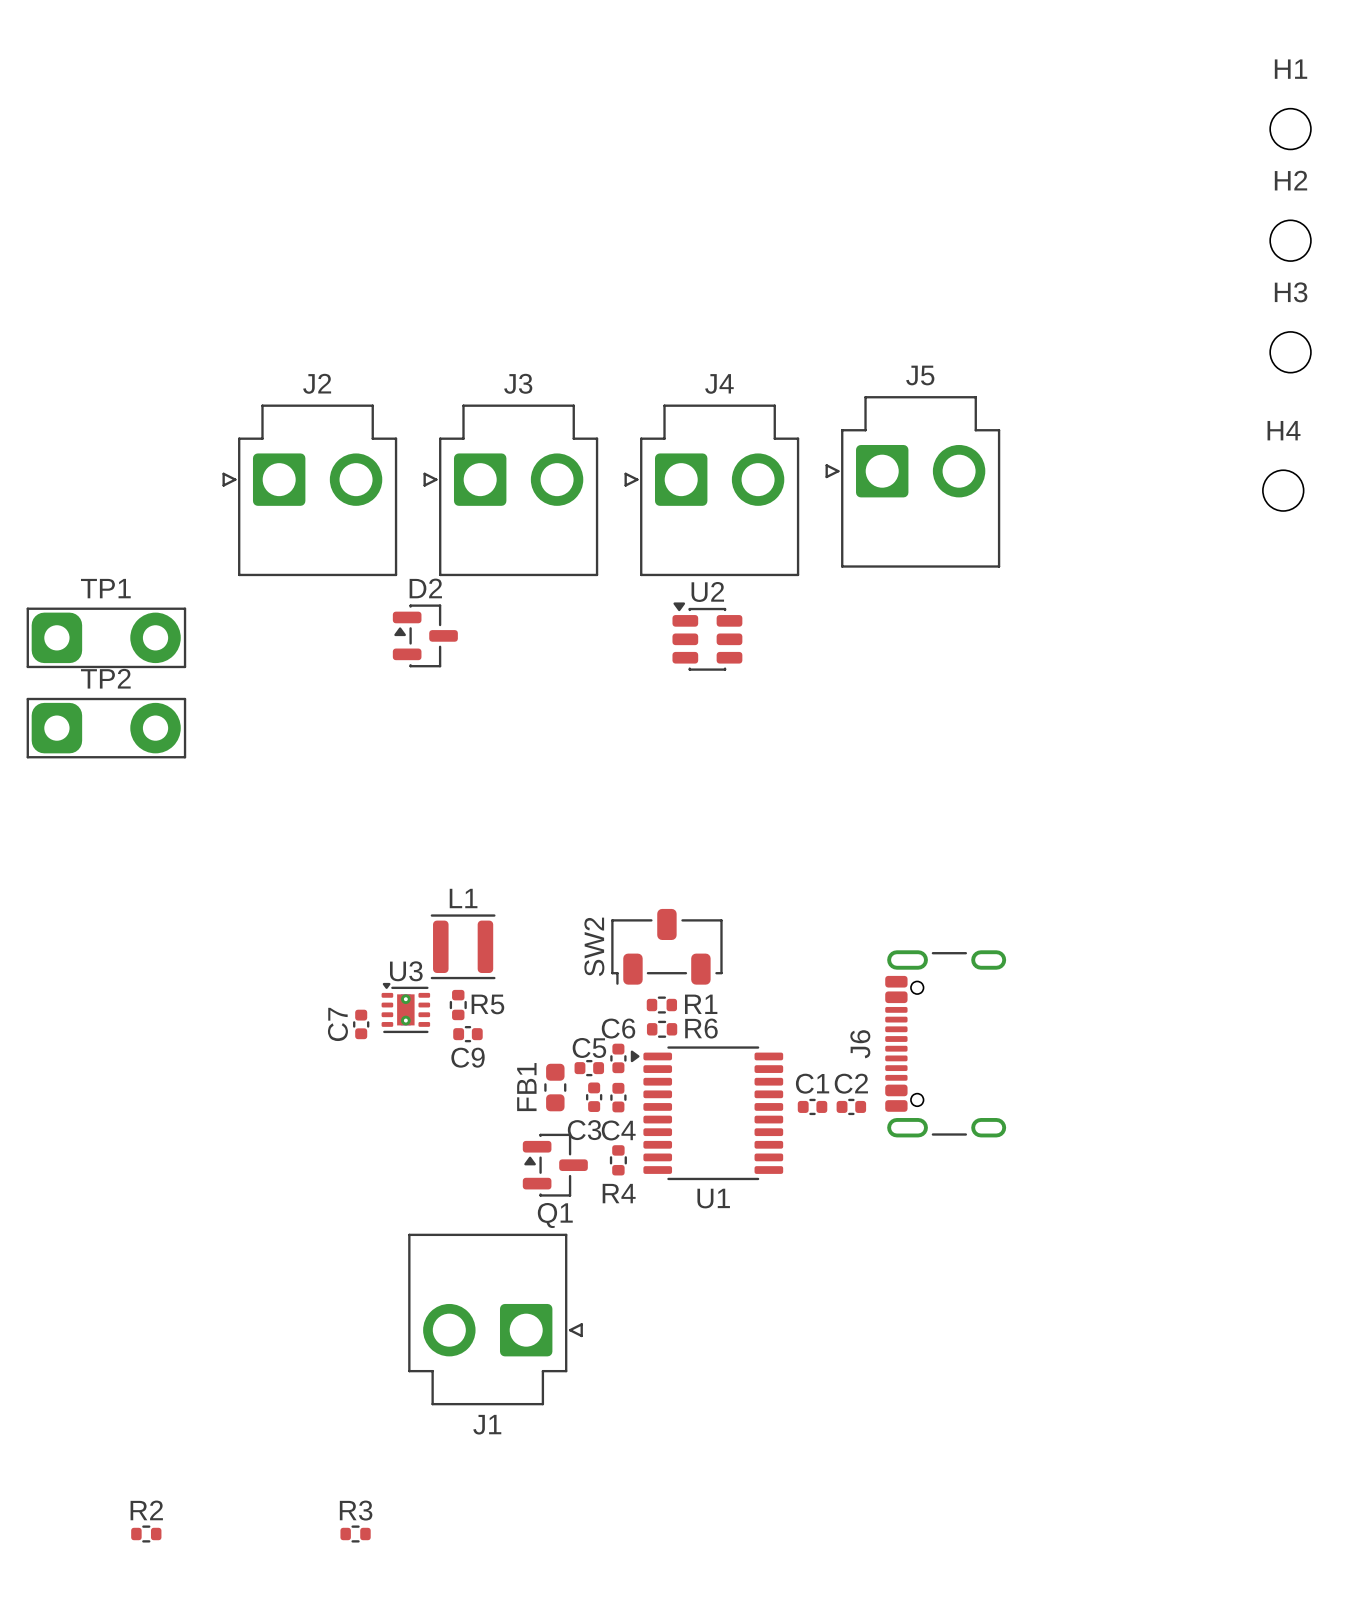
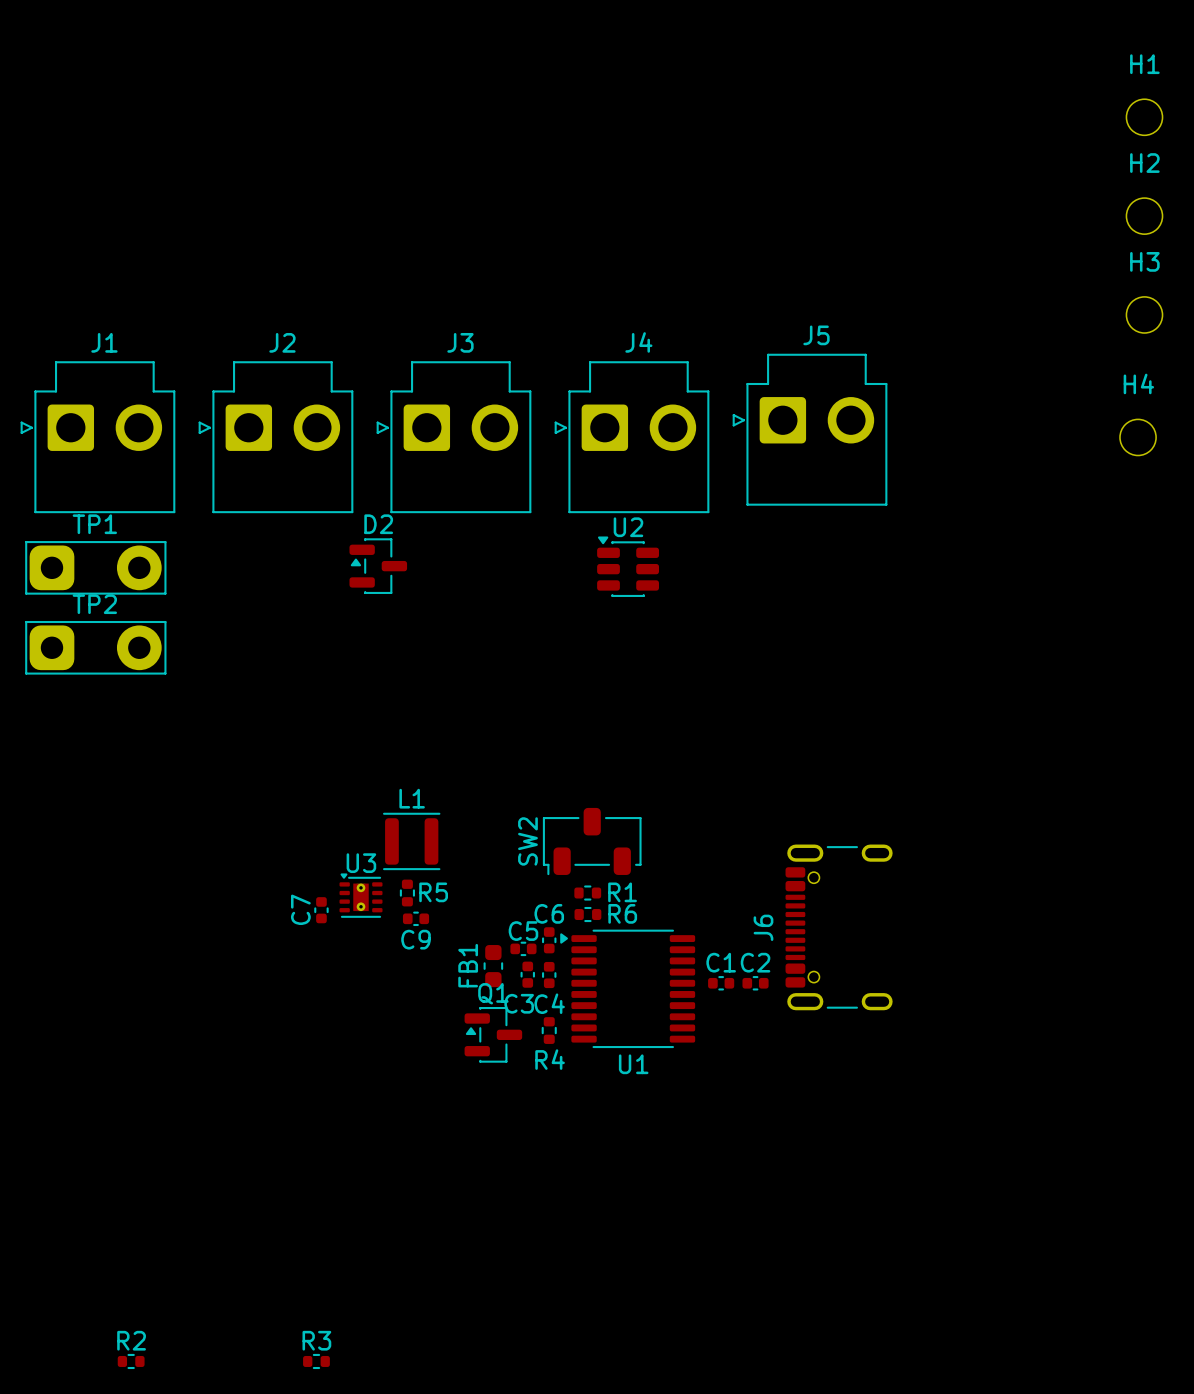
Q1 name position: Q1 (555, 1215) -> Q1 (493, 993)
J1 rotation: 0° (495, 1319) -> 180° (97, 437)
J1 position: (495, 1319) -> (97, 437)

